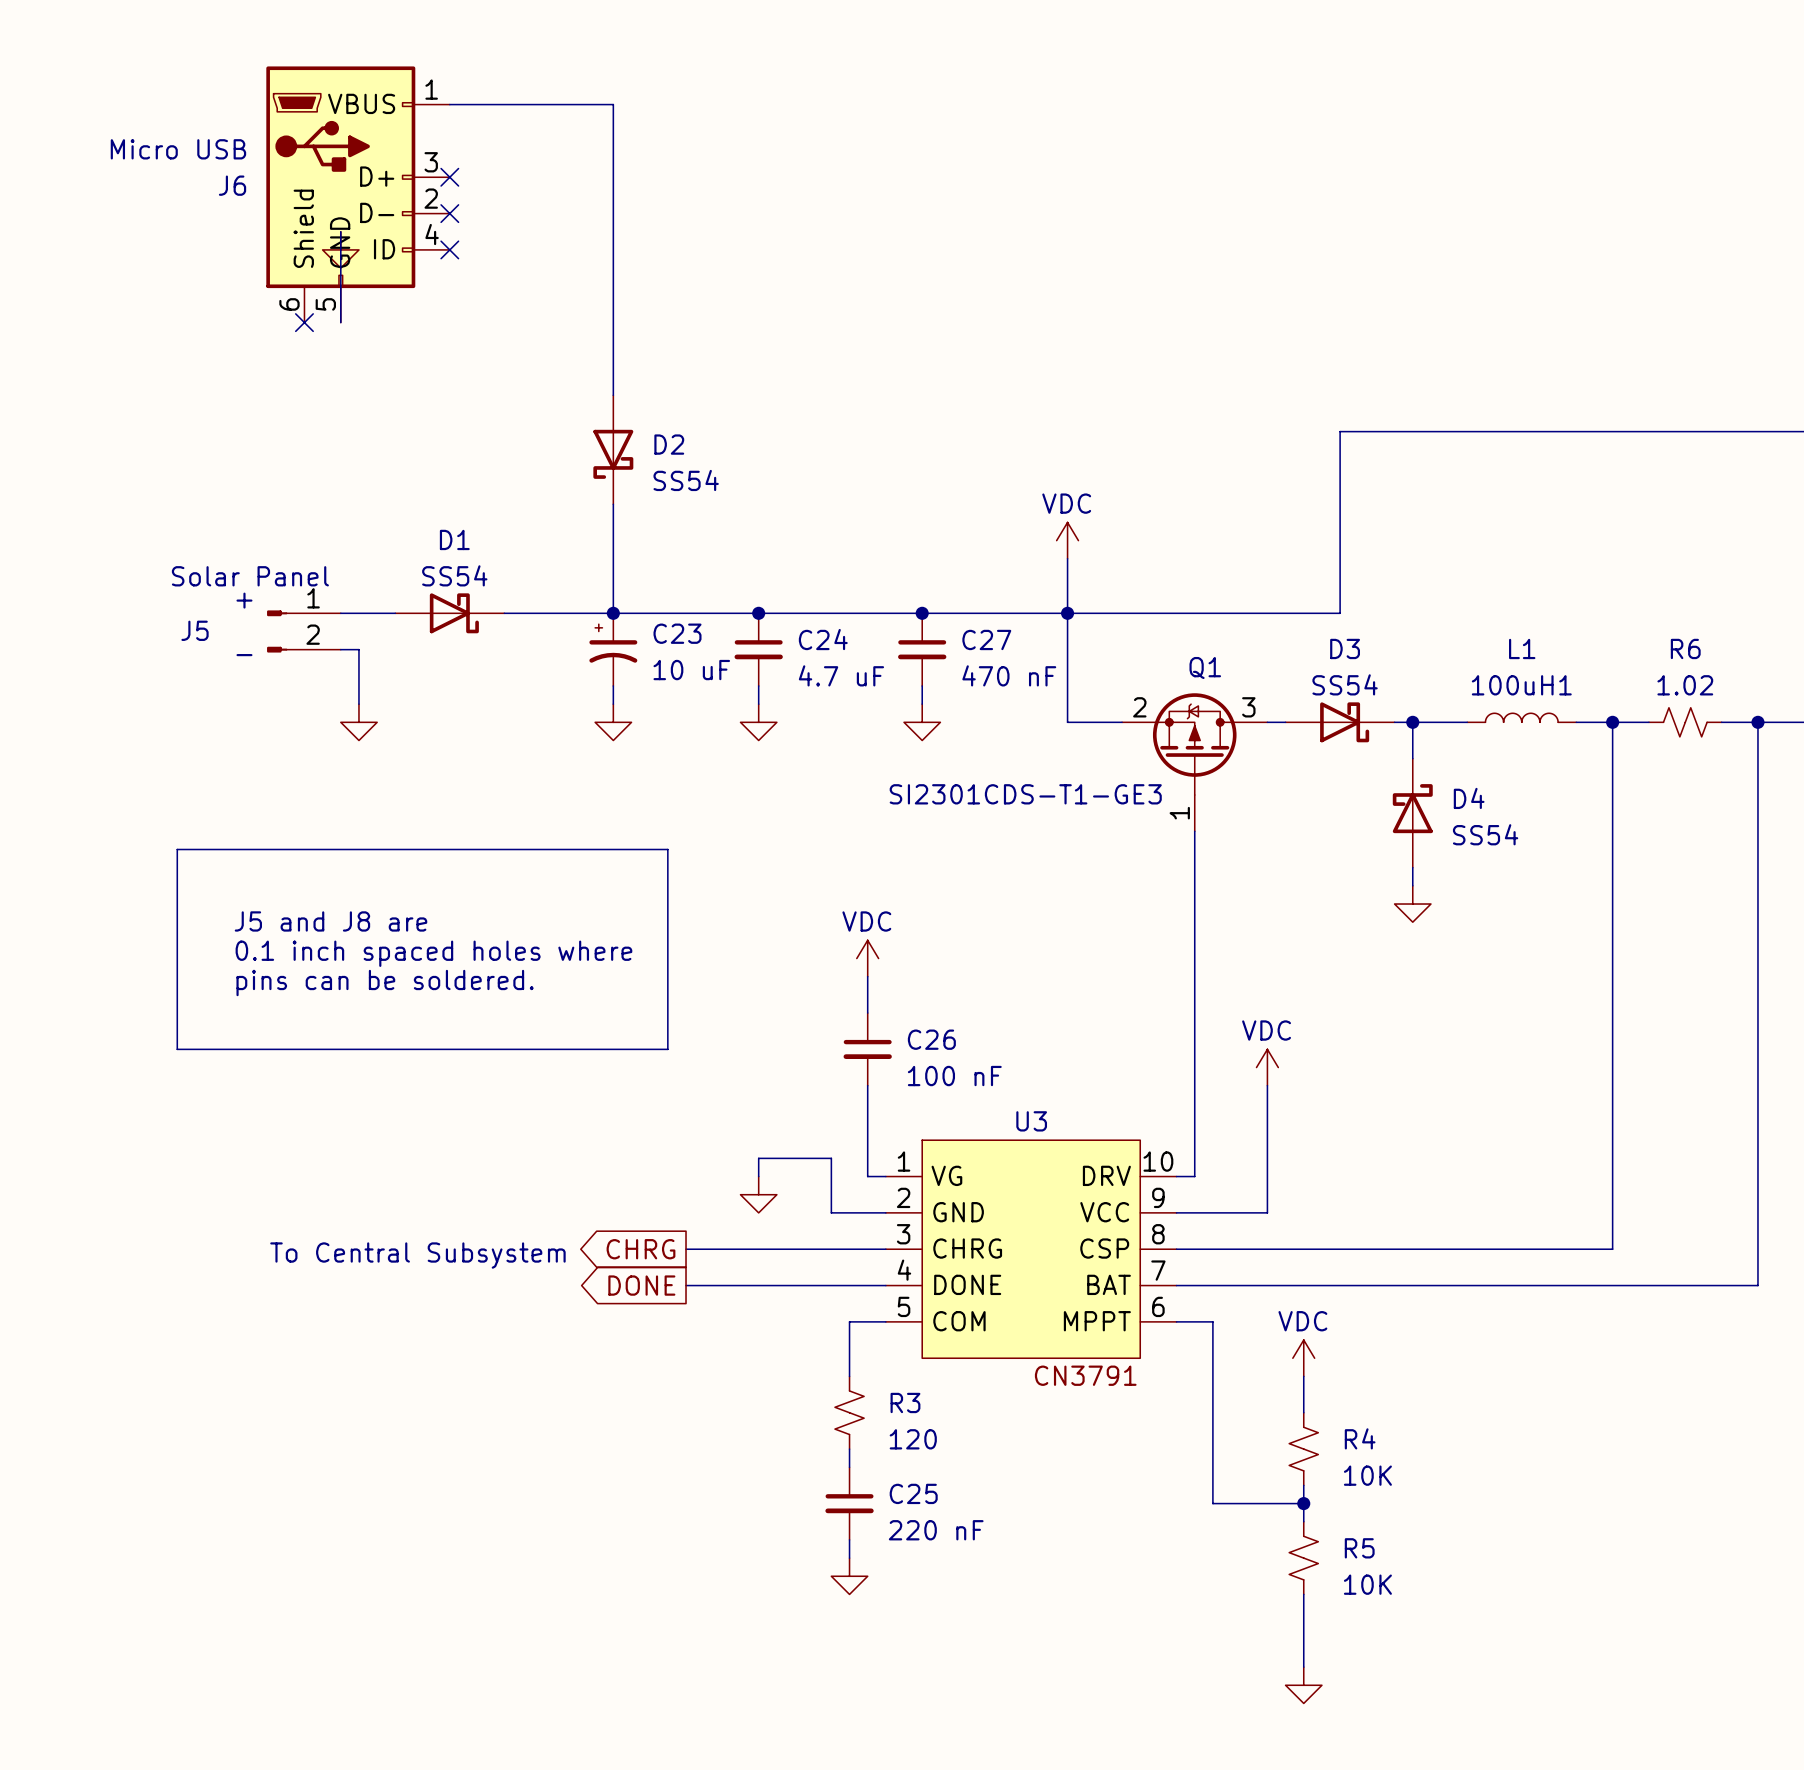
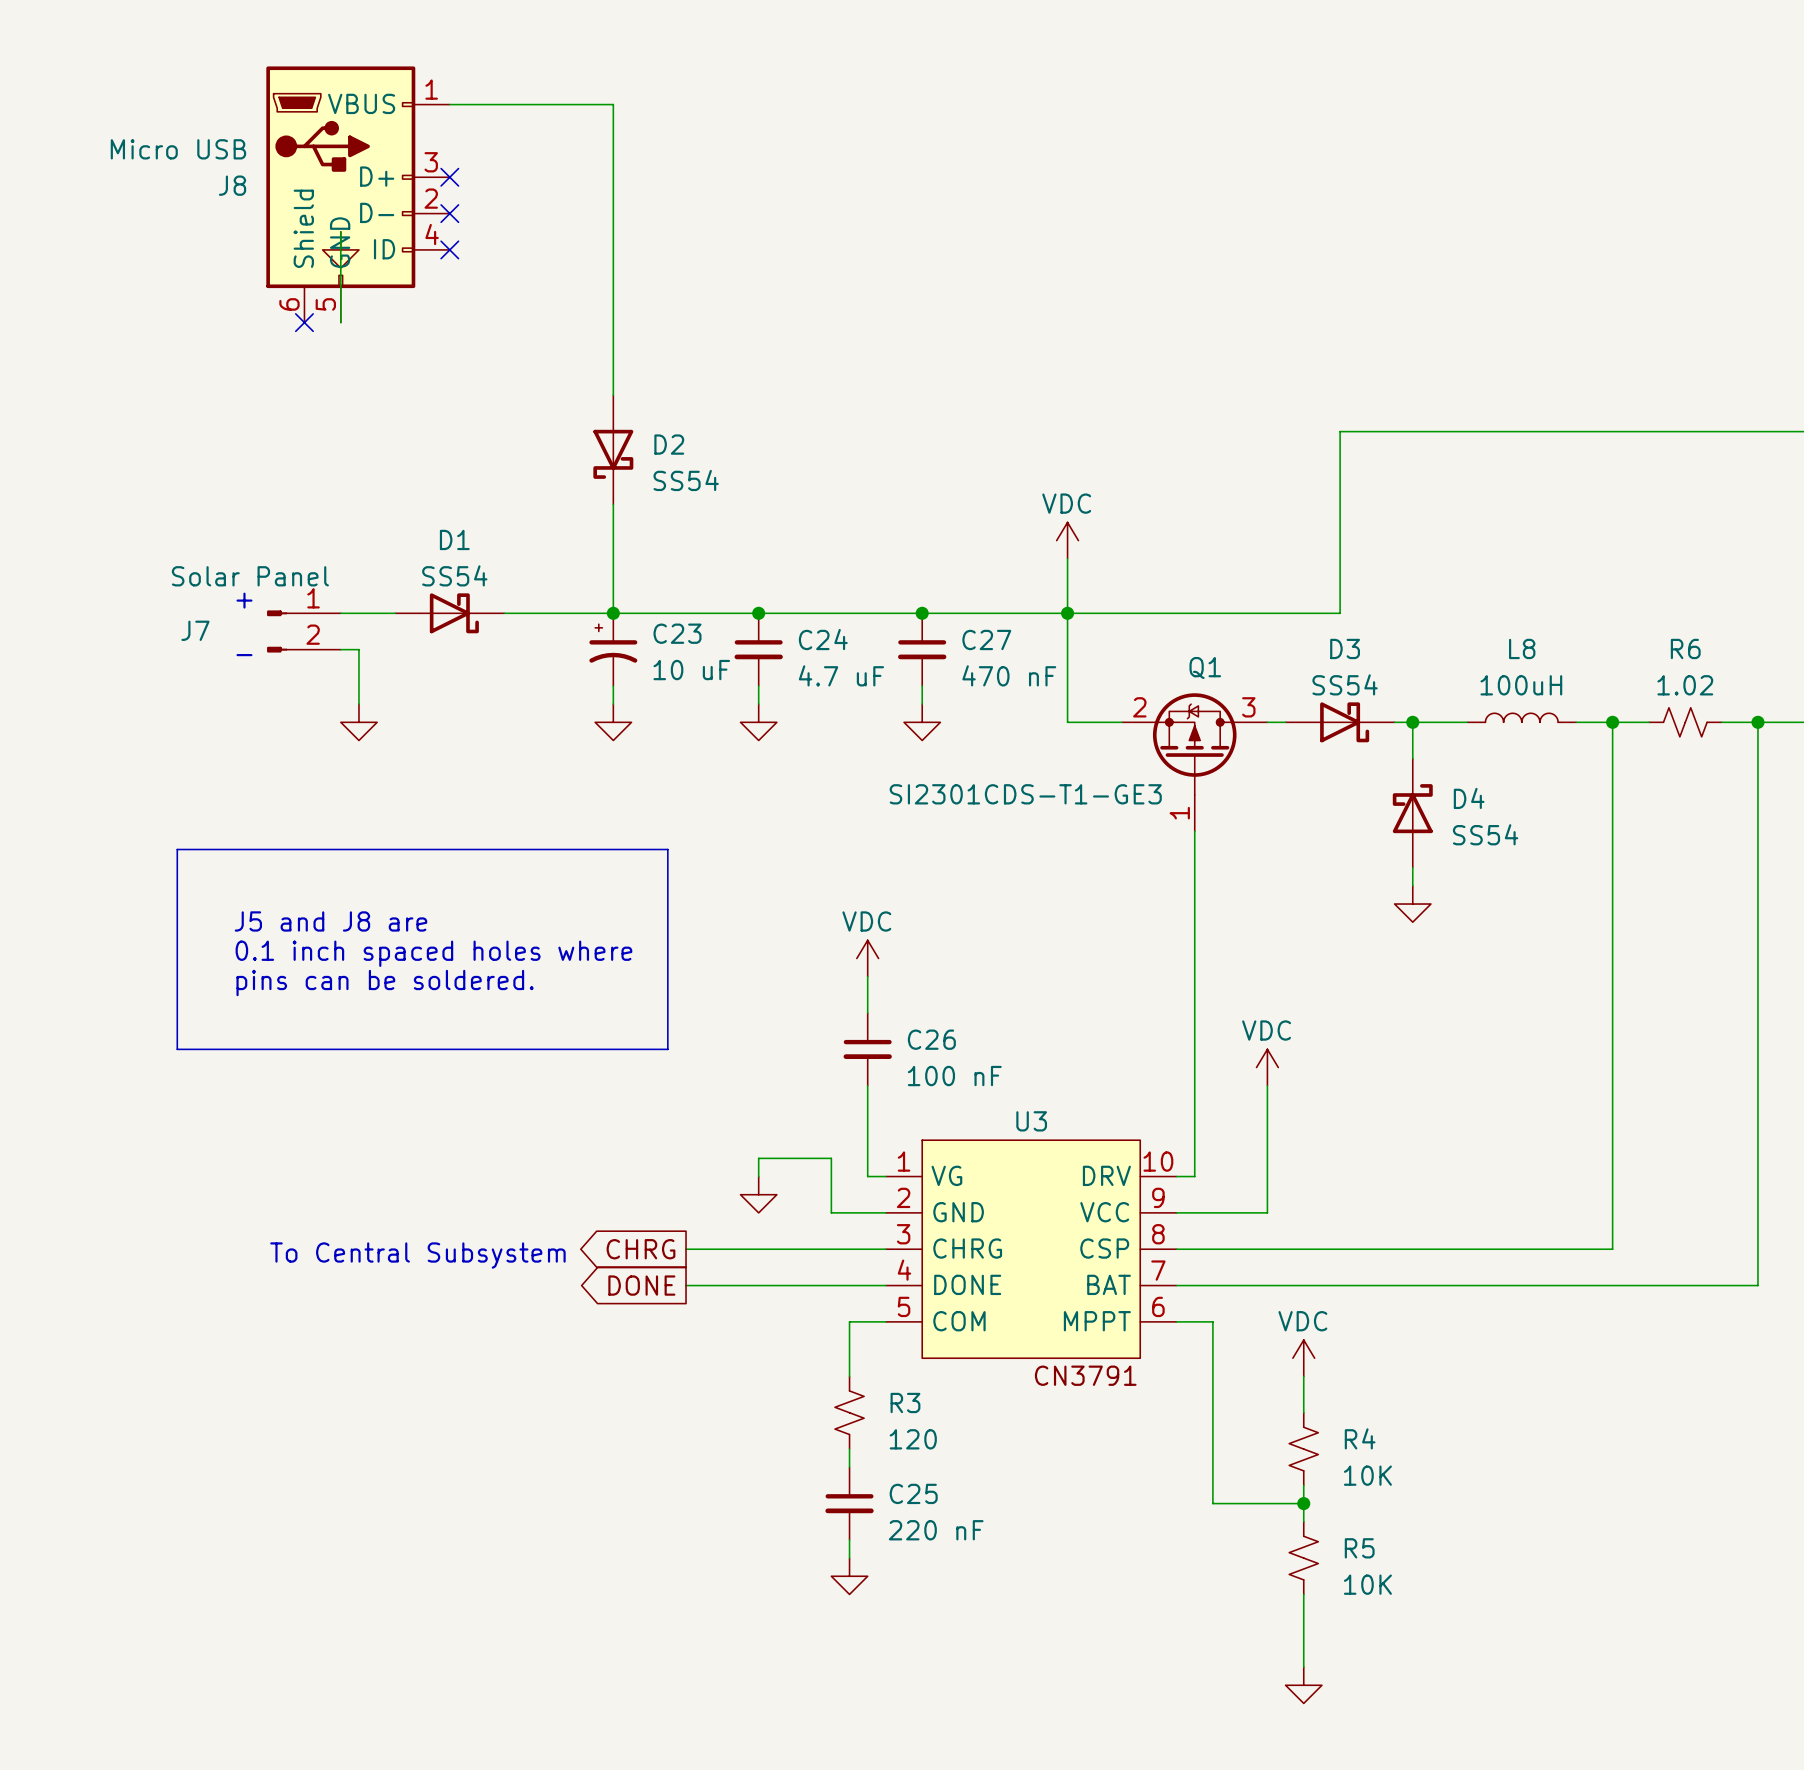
J6 name: J6 (232, 185) -> J8 (232, 185)
J5 name: J5 (195, 630) -> J7 (195, 630)
100uH1 value: L1 (1522, 648) -> 100uH (1521, 685)
100uH1 name: 100uH1 (1521, 685) -> L8 (1522, 648)

